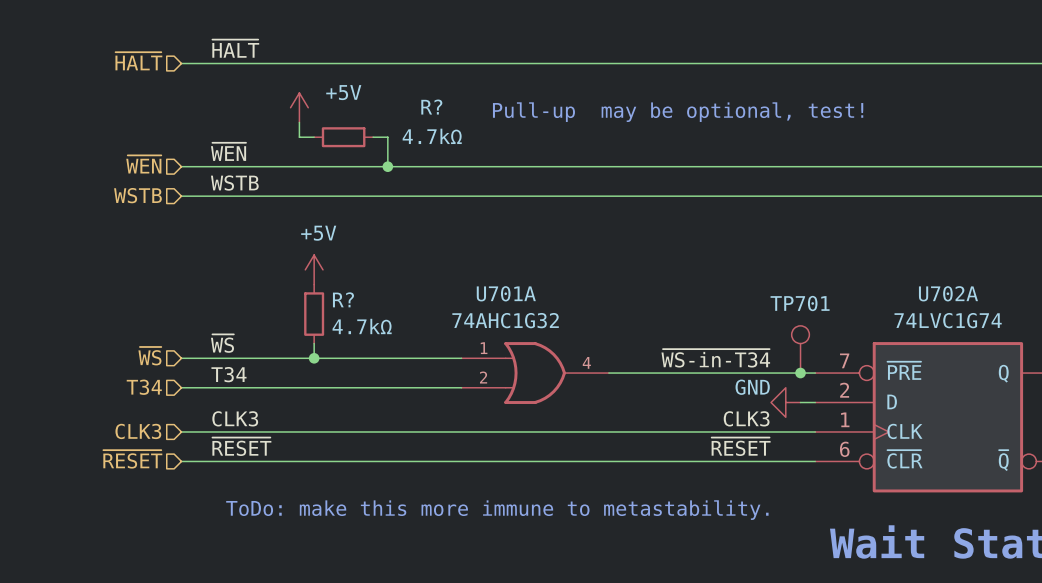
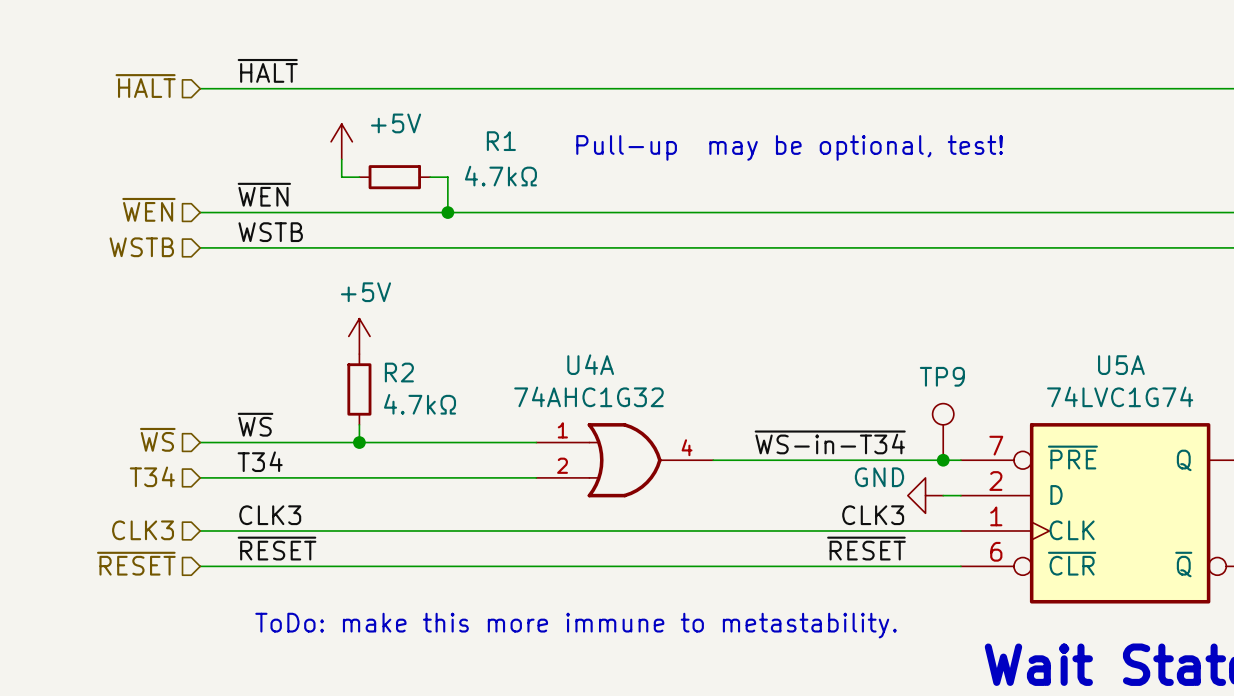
R? name: R? (431, 107) -> R1 (501, 141)
U701A name: U701A (506, 293) -> U4A (590, 364)
U702A name: U702A (948, 293) -> U5A (1121, 365)
R? name: R? (343, 299) -> R2 (399, 372)
TP701 name: TP701 (800, 303) -> TP9 (942, 376)

